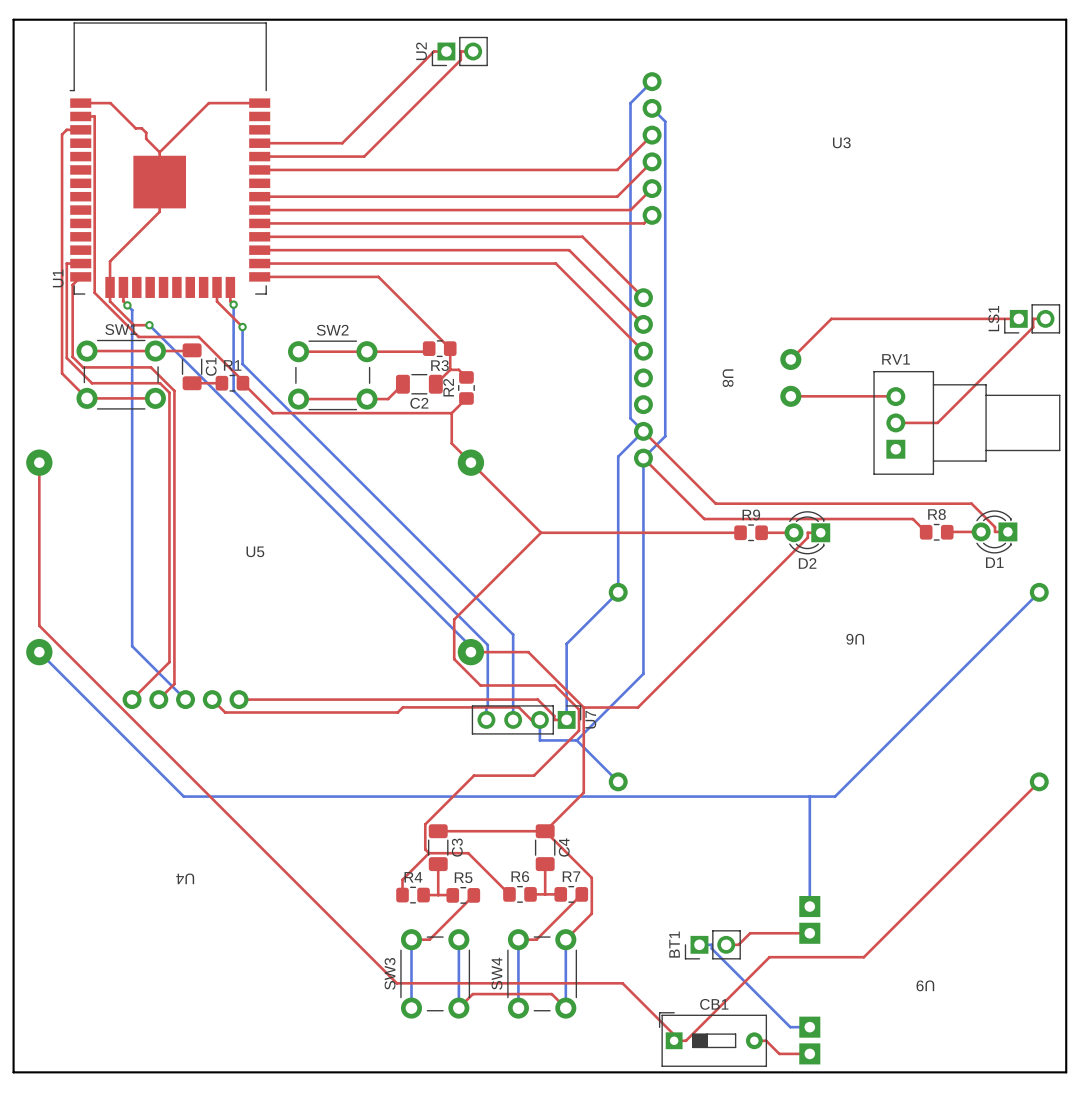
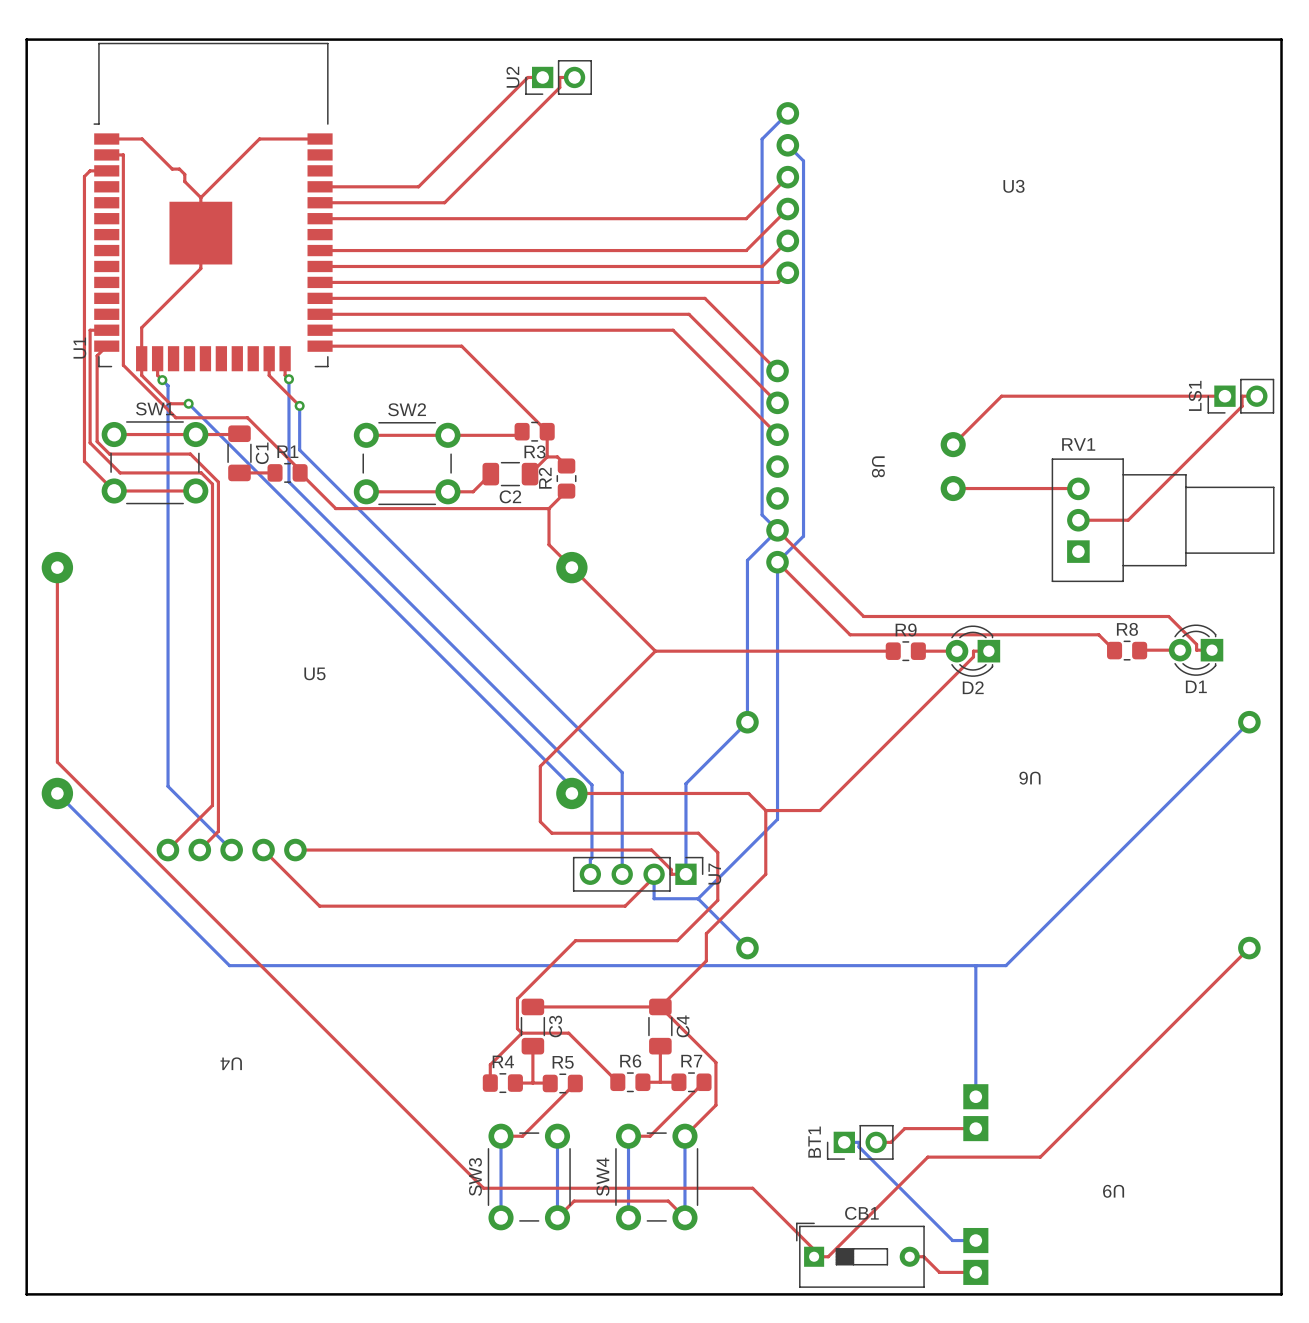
top track: (454, 619) (454, 659) (480, 685) -> (551, 754) (540, 766) (540, 821) (551, 833) (583, 833)
top track: (528, 652) (583, 707) -> (640, 793) (748, 793) (765, 810)
top track: (679, 666) (637, 707) (583, 707) -> (819, 810) (765, 810)
top track: (555, 685) (579, 709) (579, 730) (534, 775) -> (672, 833) (698, 833) (717, 852) (717, 900) (677, 940) (647, 940)
top track: (583, 707) (583, 769) -> (765, 810) (765, 874) (706, 933)
top track: (225, 712) (397, 712) (402, 707) (518, 707) (531, 719) (539, 719) -> (278, 865) (319, 906) (625, 906) (654, 877) (654, 874)

